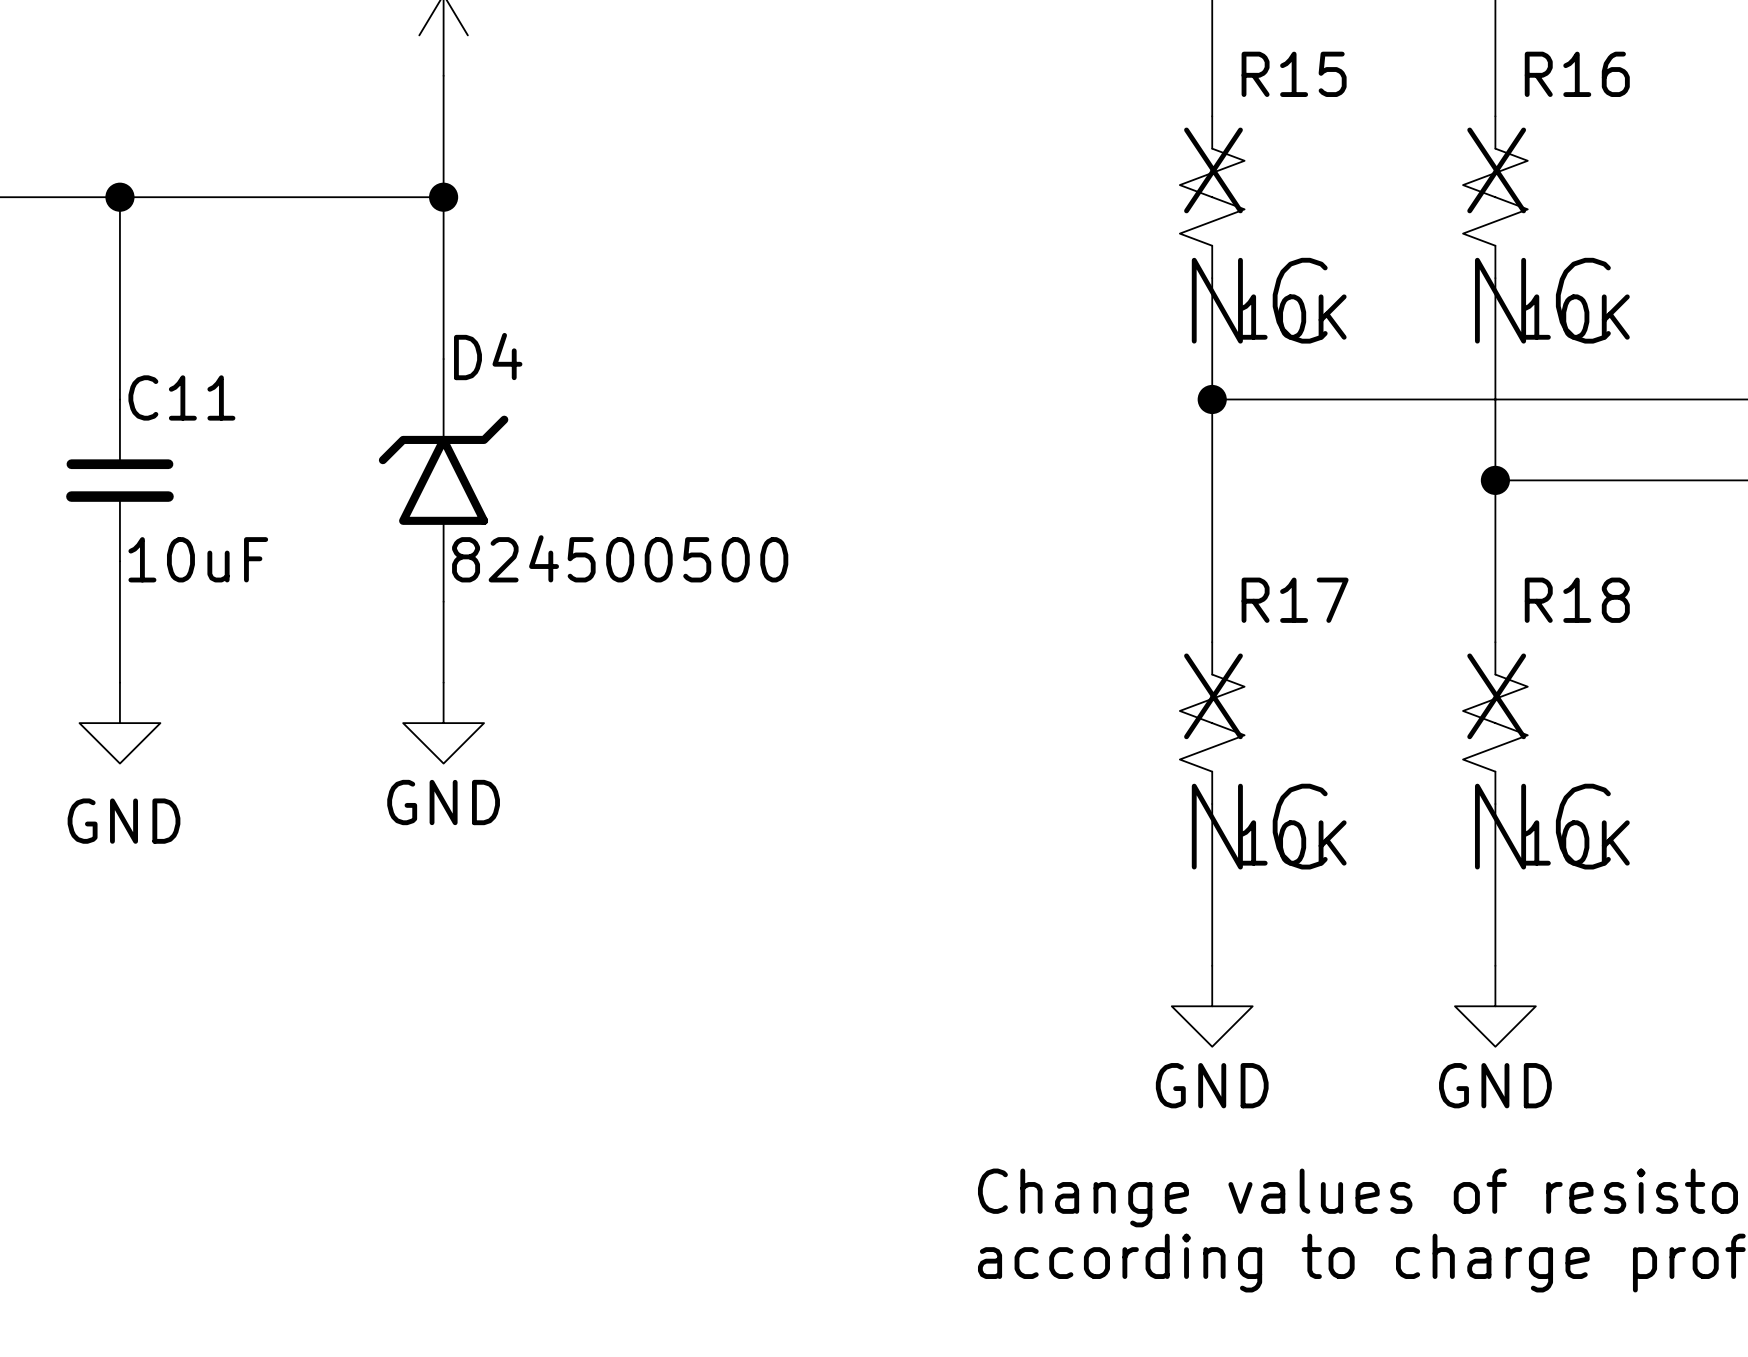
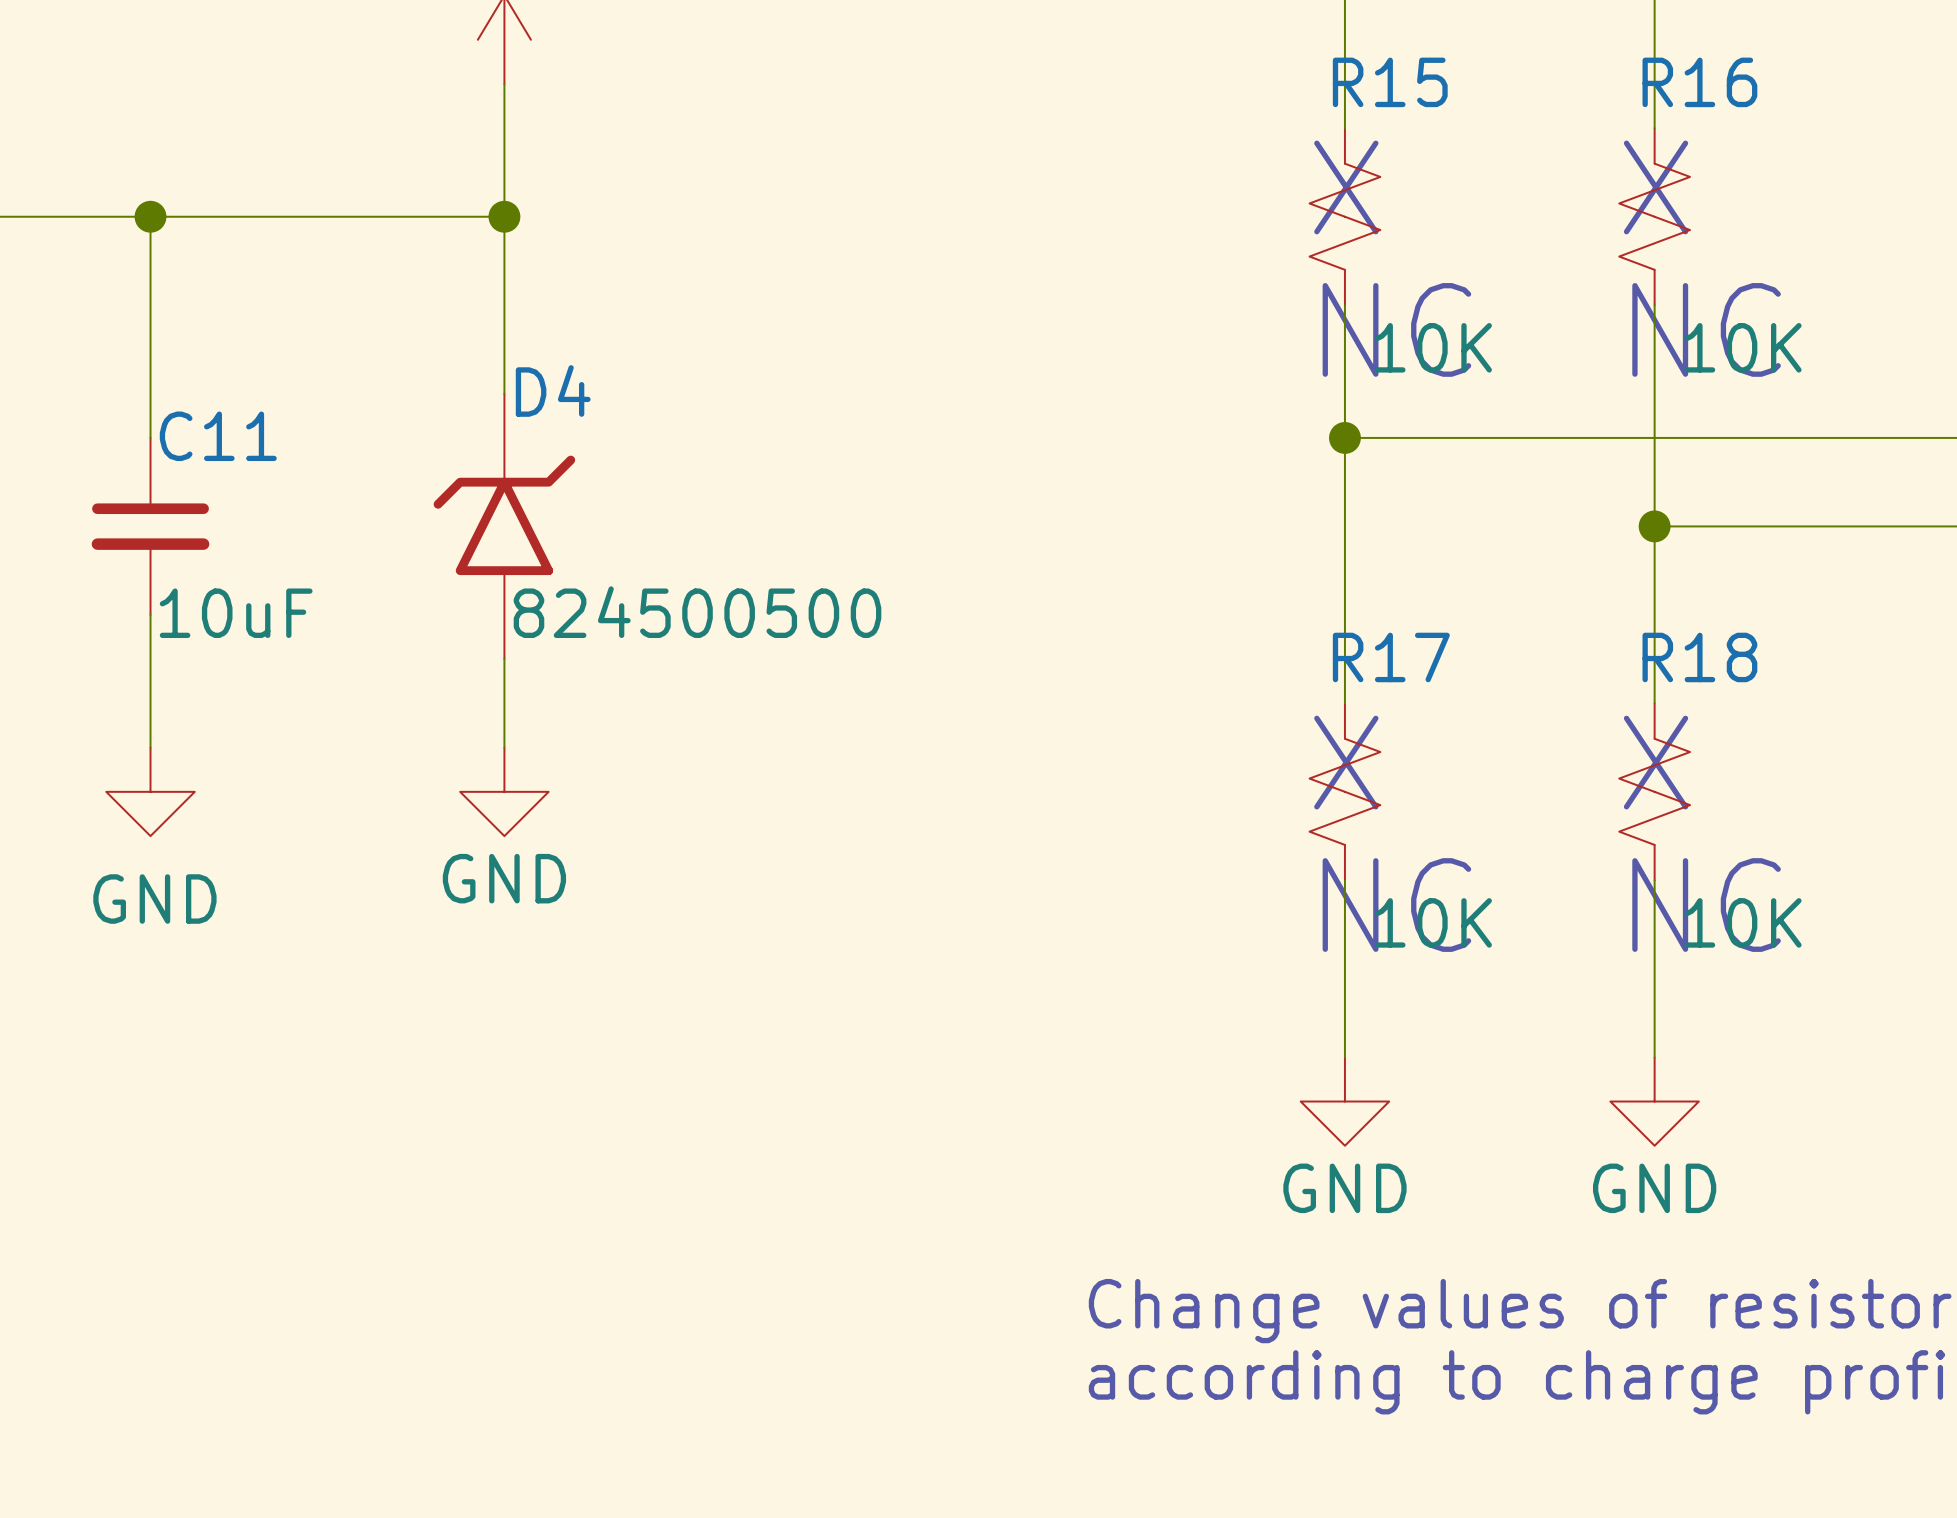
R15 name position: R15 (1294, 74) -> R15 (1390, 82)
R16 name position: R16 (1577, 74) -> R16 (1699, 82)
R17 name position: R17 (1295, 600) -> R17 (1391, 657)
R18 name position: R18 (1577, 600) -> R18 (1699, 657)

